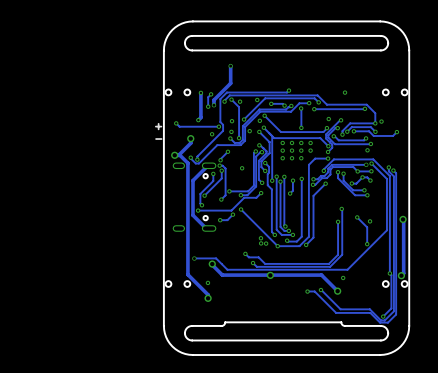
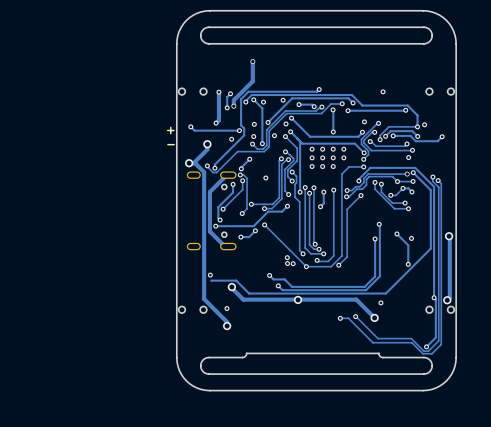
via: none -> (210, 275)
via: (194, 258) -> none

